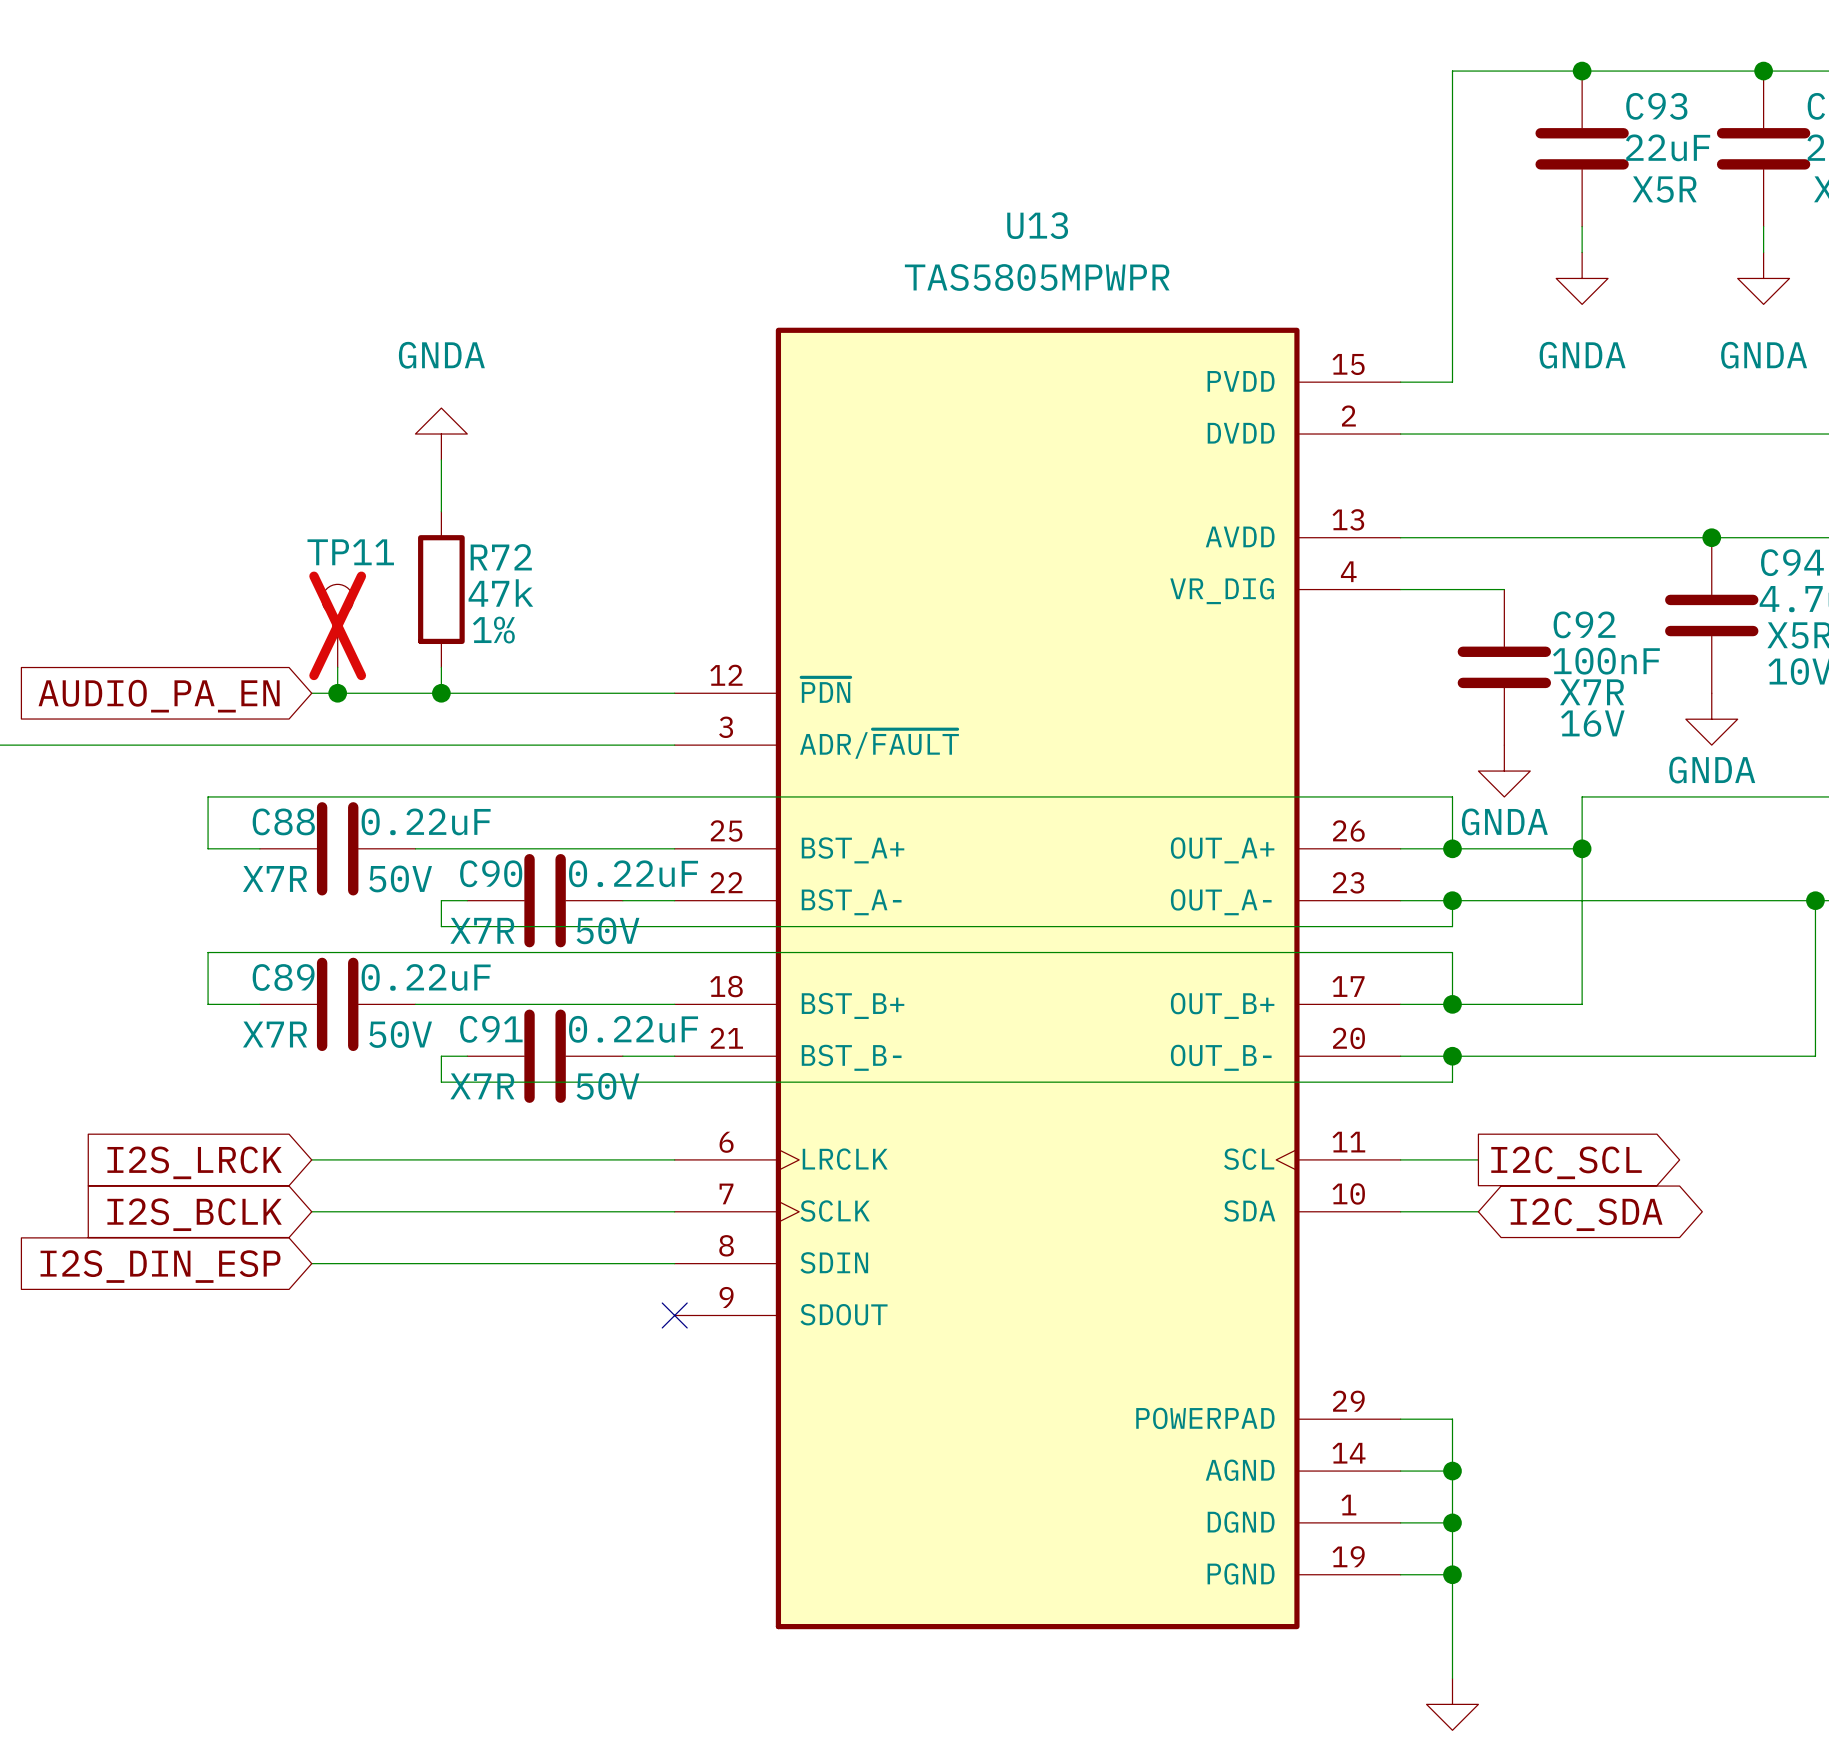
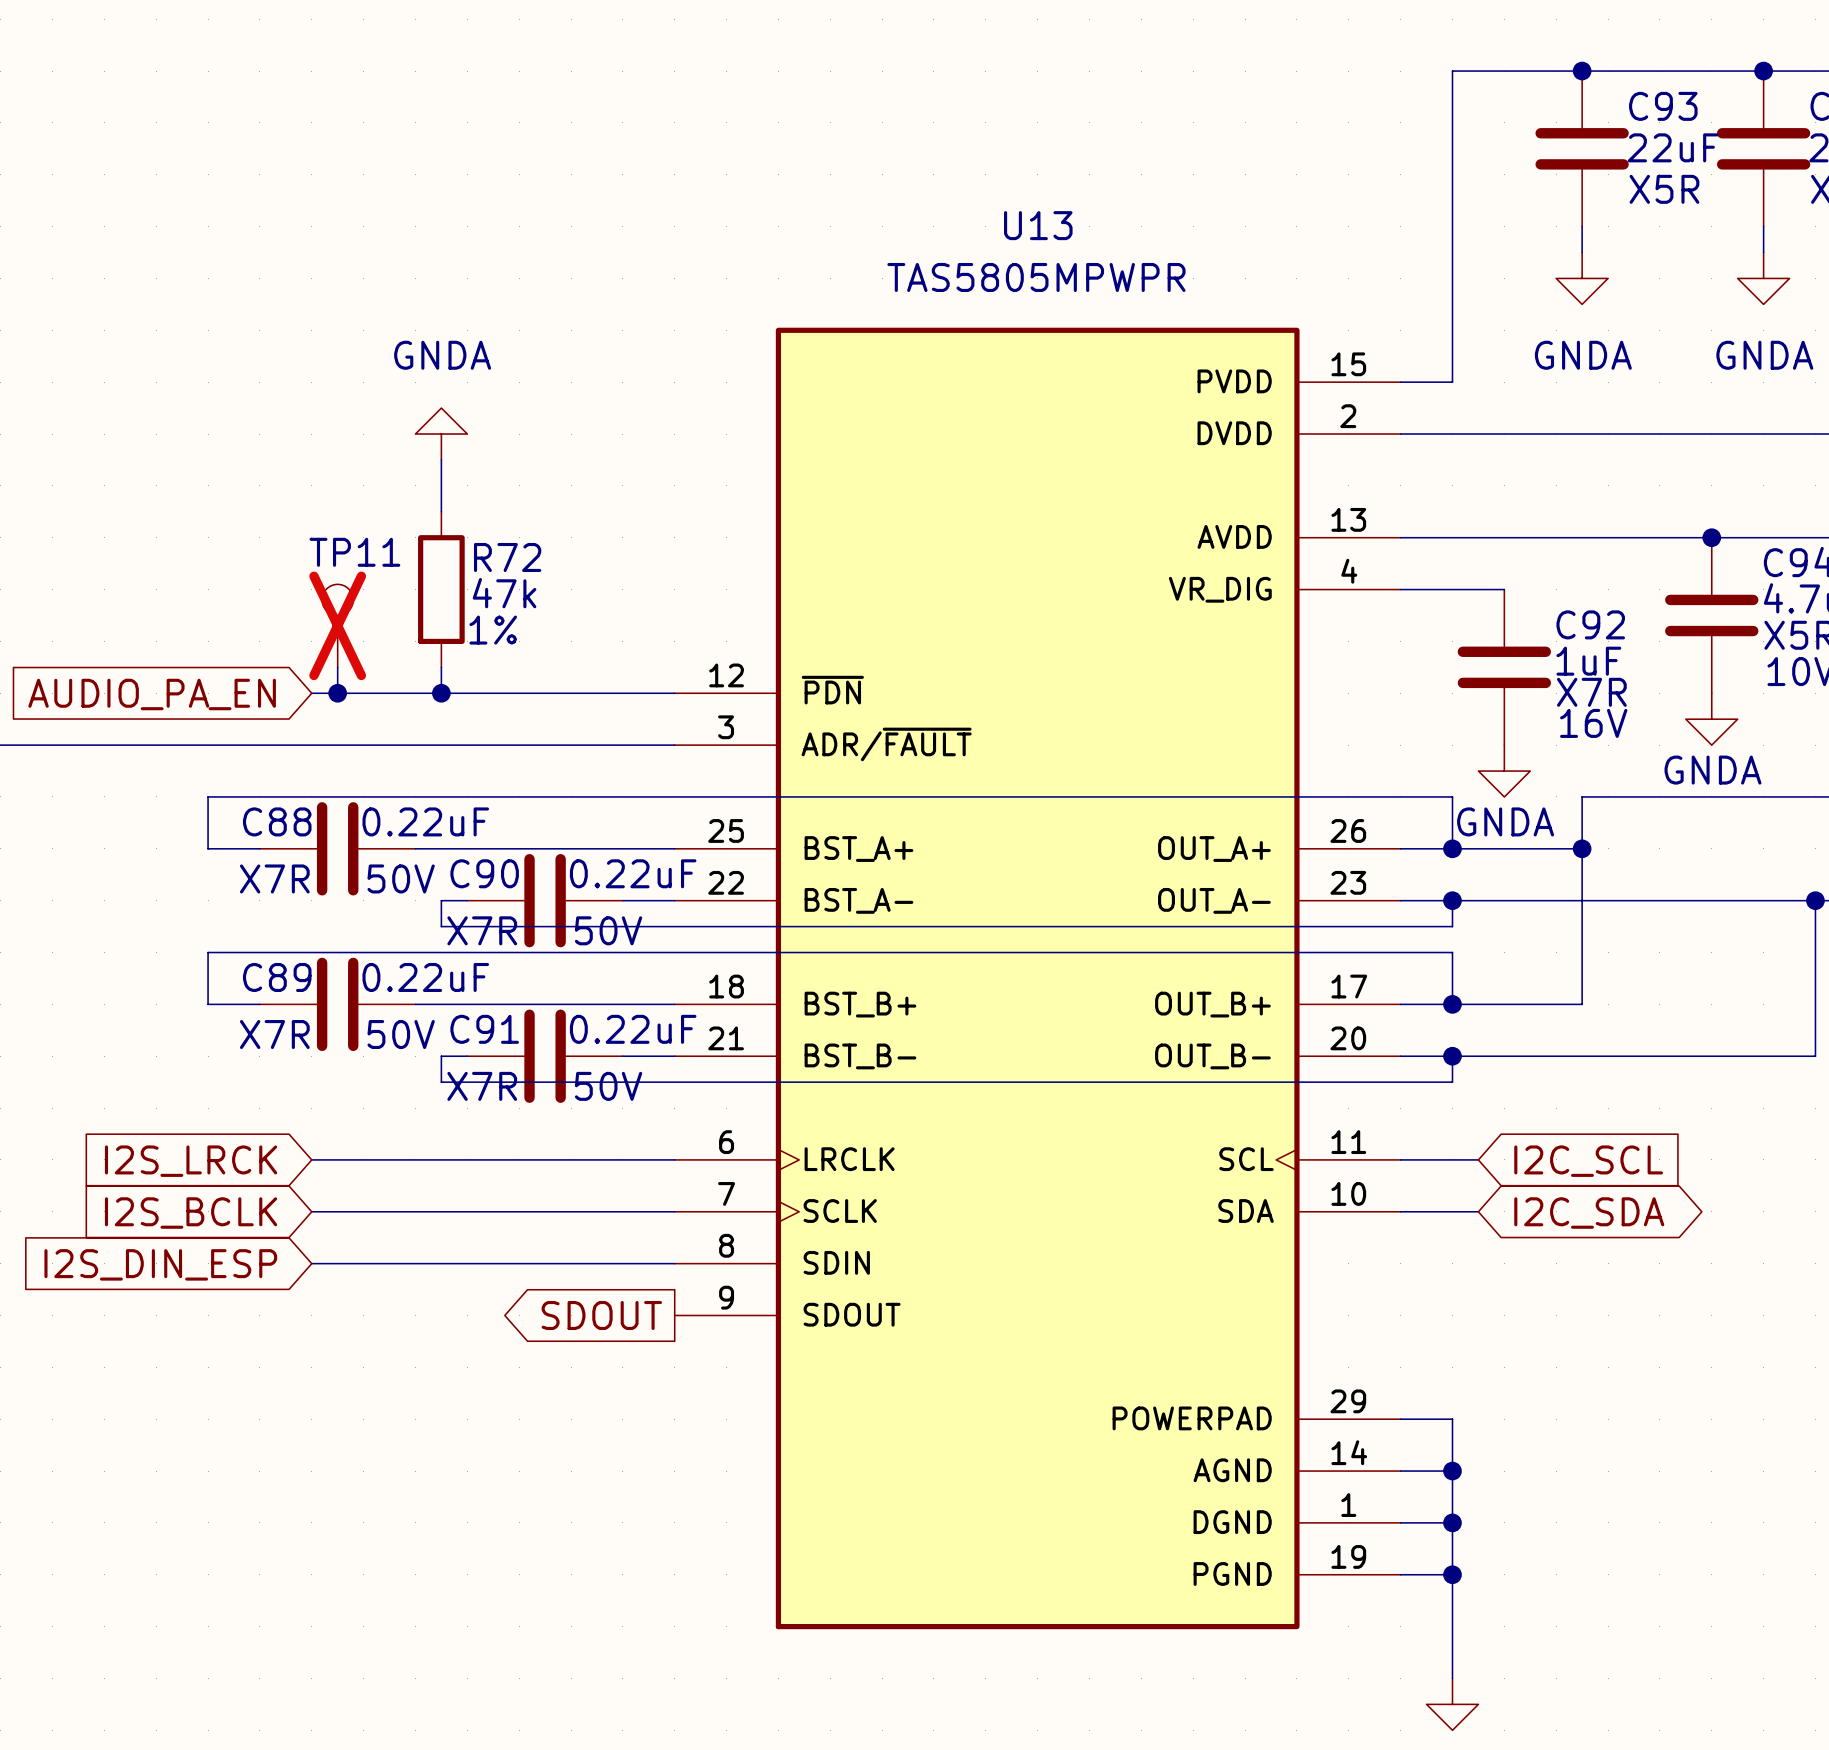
C92 value: 100nF (1606, 661) -> 1uF (1588, 661)
global label shape: output (1566, 1162) -> input (1588, 1161)
global label: none -> SDOUT (601, 1315)
no-connect mark: (674, 1315) -> none

